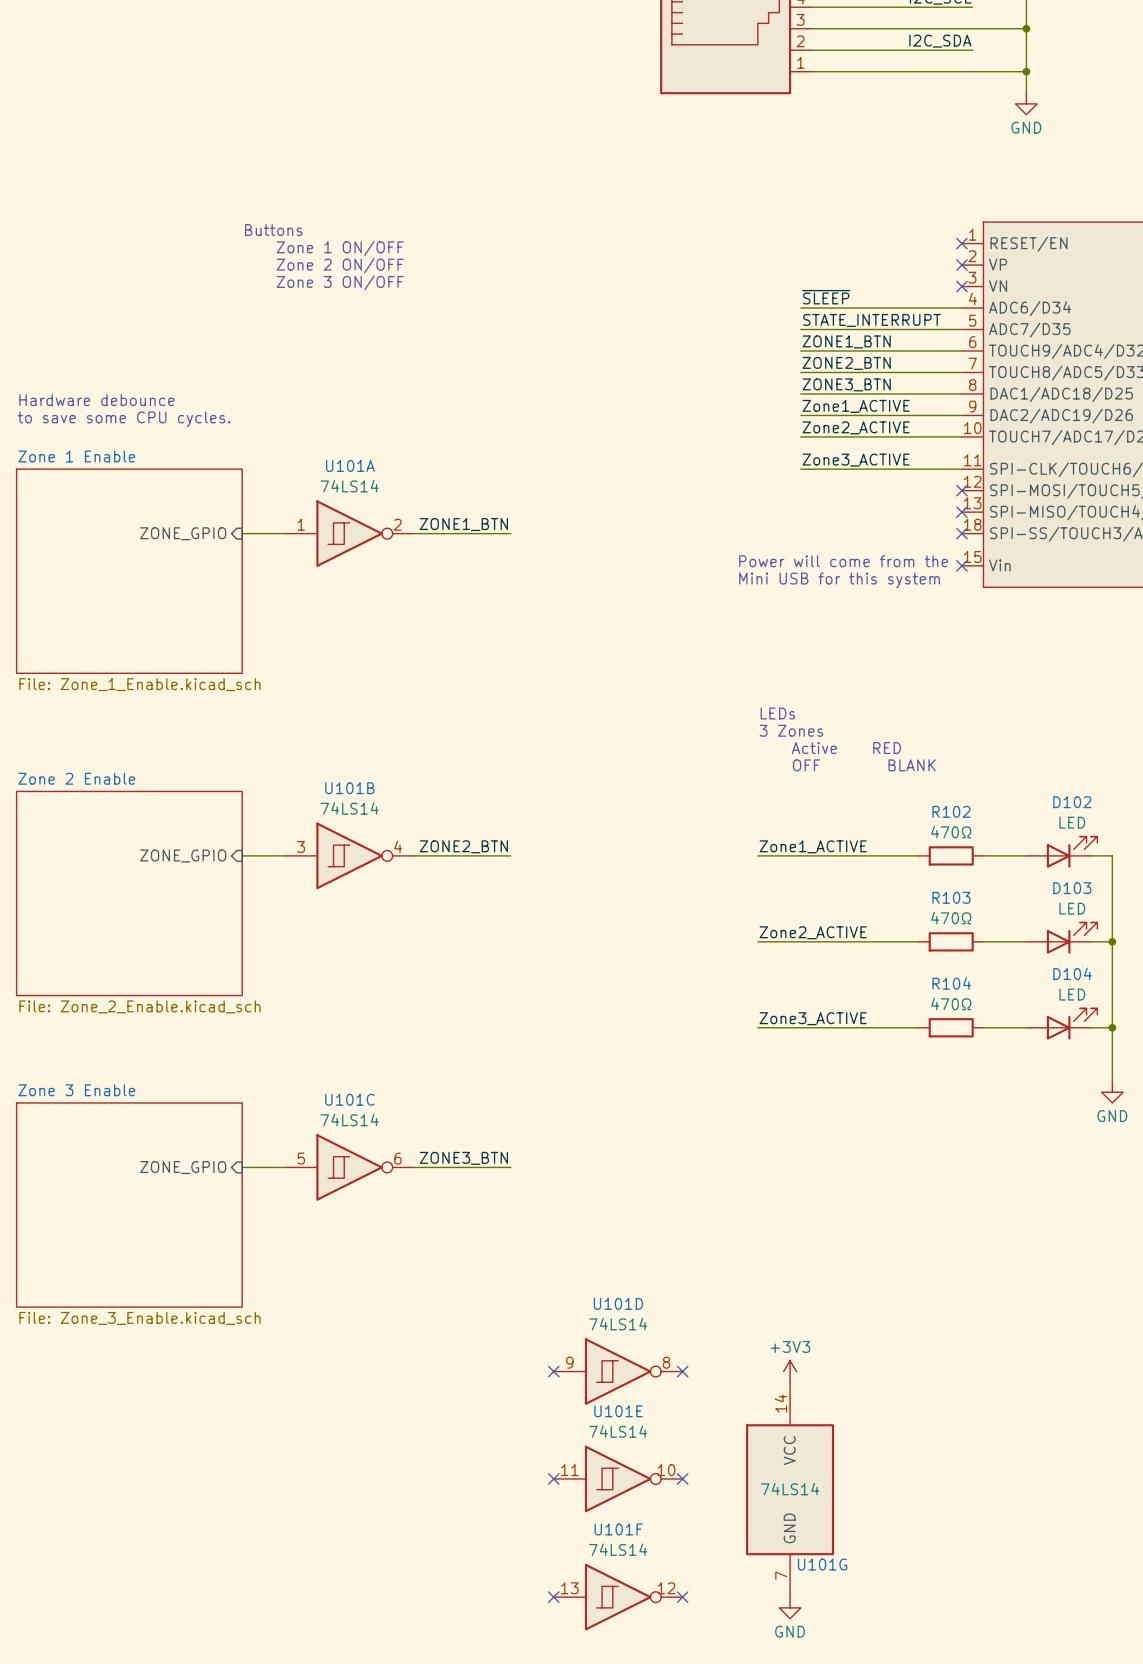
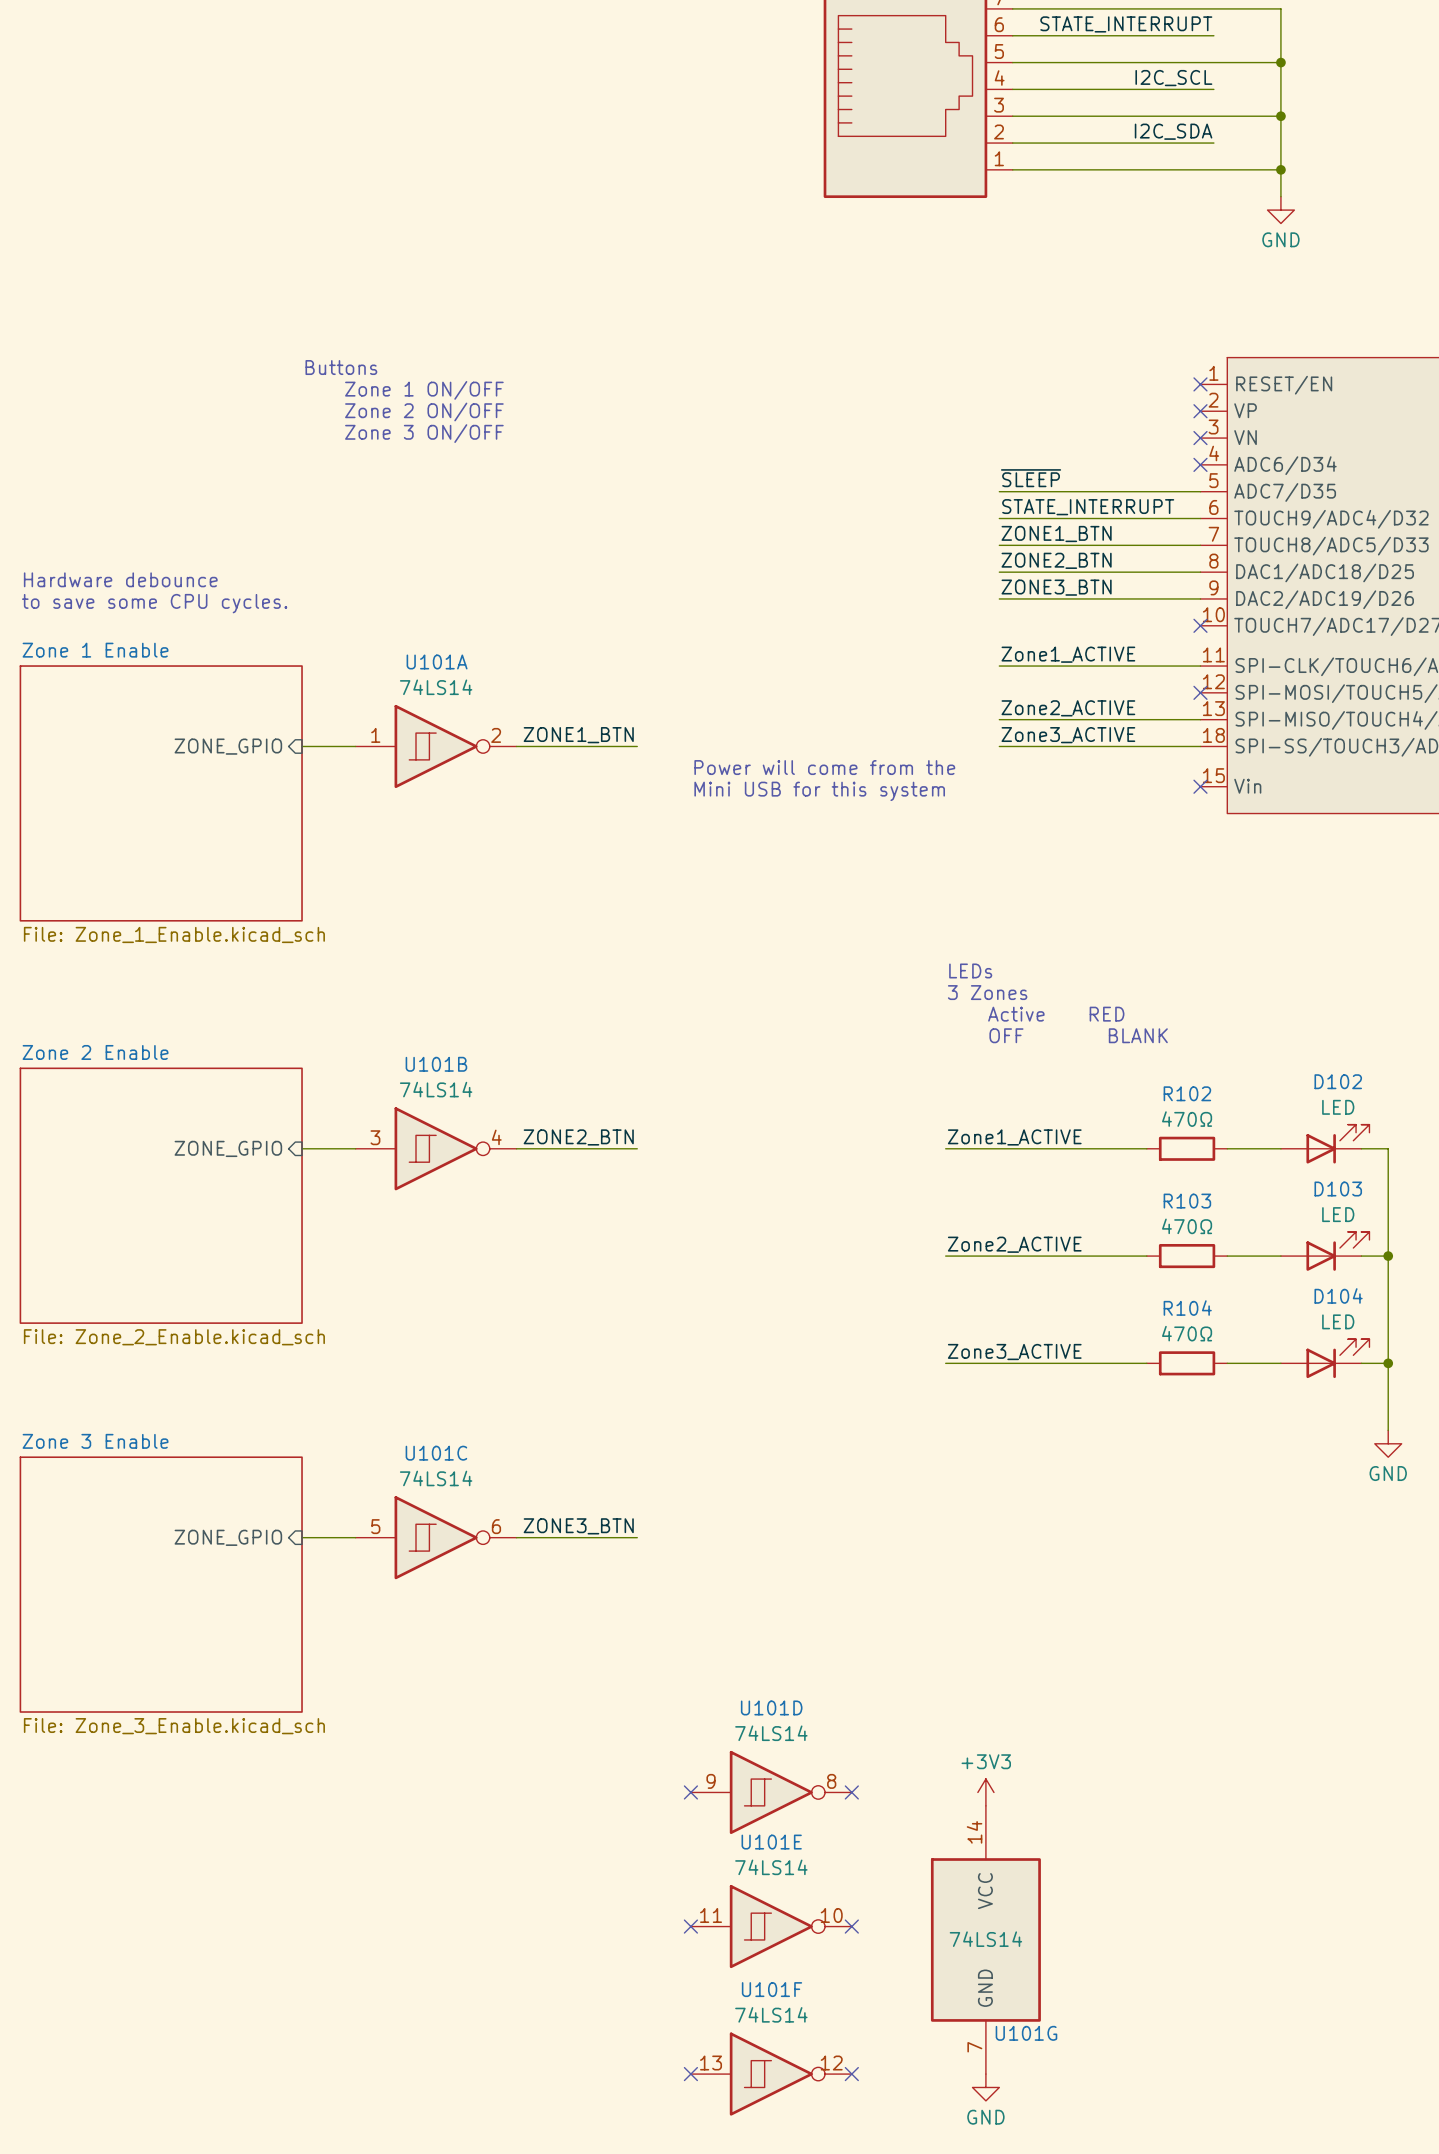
label: ~{SLEEP} (826, 297) -> none
wire: (800, 308) (961, 308) -> none
no-connect mark: none -> (1200, 464)
label: STATE_INTERRUPT (872, 320) -> ~{SLEEP} (1031, 478)
label: ZONE1_BTN (846, 341) -> STATE_INTERRUPT (1088, 507)
label: ZONE2_BTN (846, 363) -> ZONE1_BTN (1056, 534)
label: ZONE3_BTN (846, 384) -> ZONE2_BTN (1056, 560)
label: Zone1_ACTIVE (856, 406) -> ZONE3_BTN (1056, 587)
label position: Zone2_ACTIVE (856, 427) -> Zone2_ACTIVE (1068, 708)
wire: (800, 436) (961, 436) -> (999, 719) (1200, 719)
no-connect mark: none -> (1200, 625)
label: Zone3_ACTIVE (856, 460) -> Zone1_ACTIVE (1068, 654)
no-connect mark: (961, 512) -> none
label: none -> Zone3_ACTIVE (1068, 735)
wire: none -> (999, 746) (1200, 746)
no-connect mark: (961, 533) -> none
text position: Power will come from the (843, 561) -> Power will come from the (824, 767)
text position: Mini USB for this system (839, 580) -> Mini USB for this system (819, 791)

